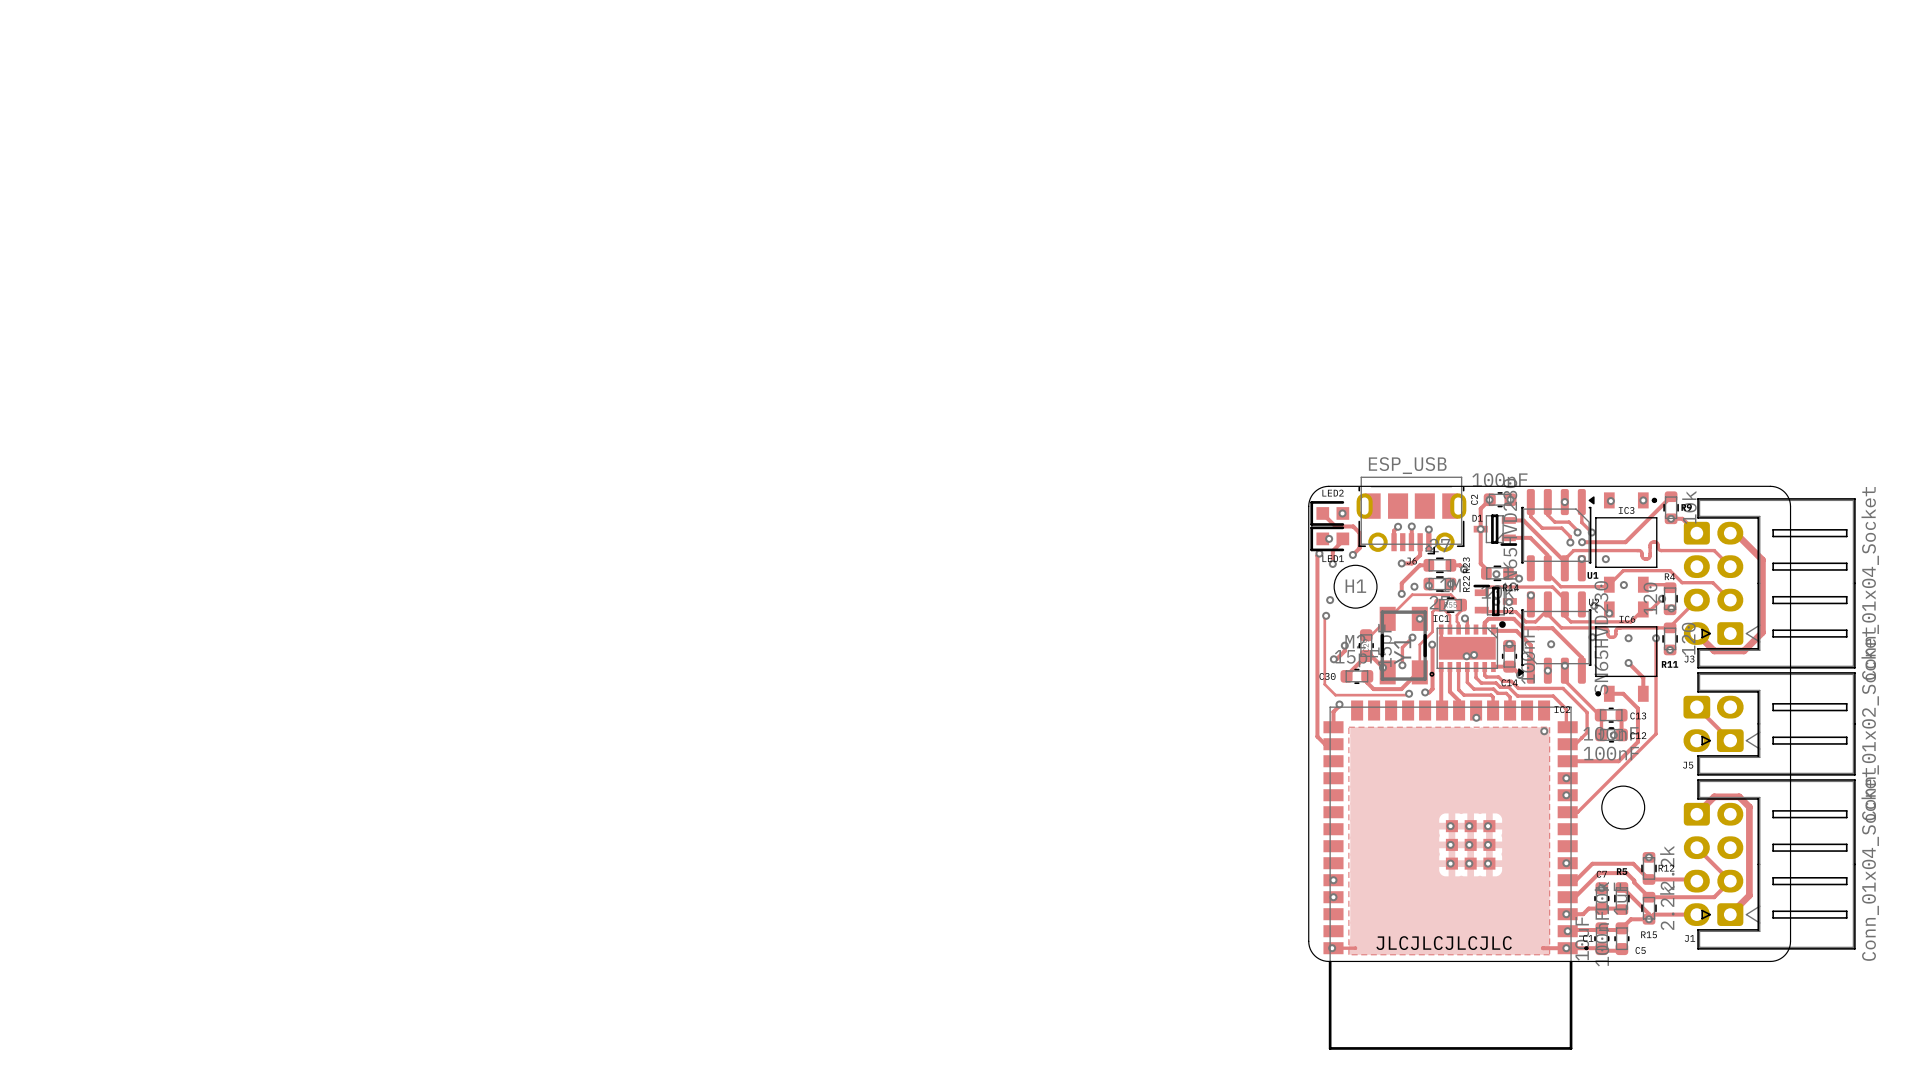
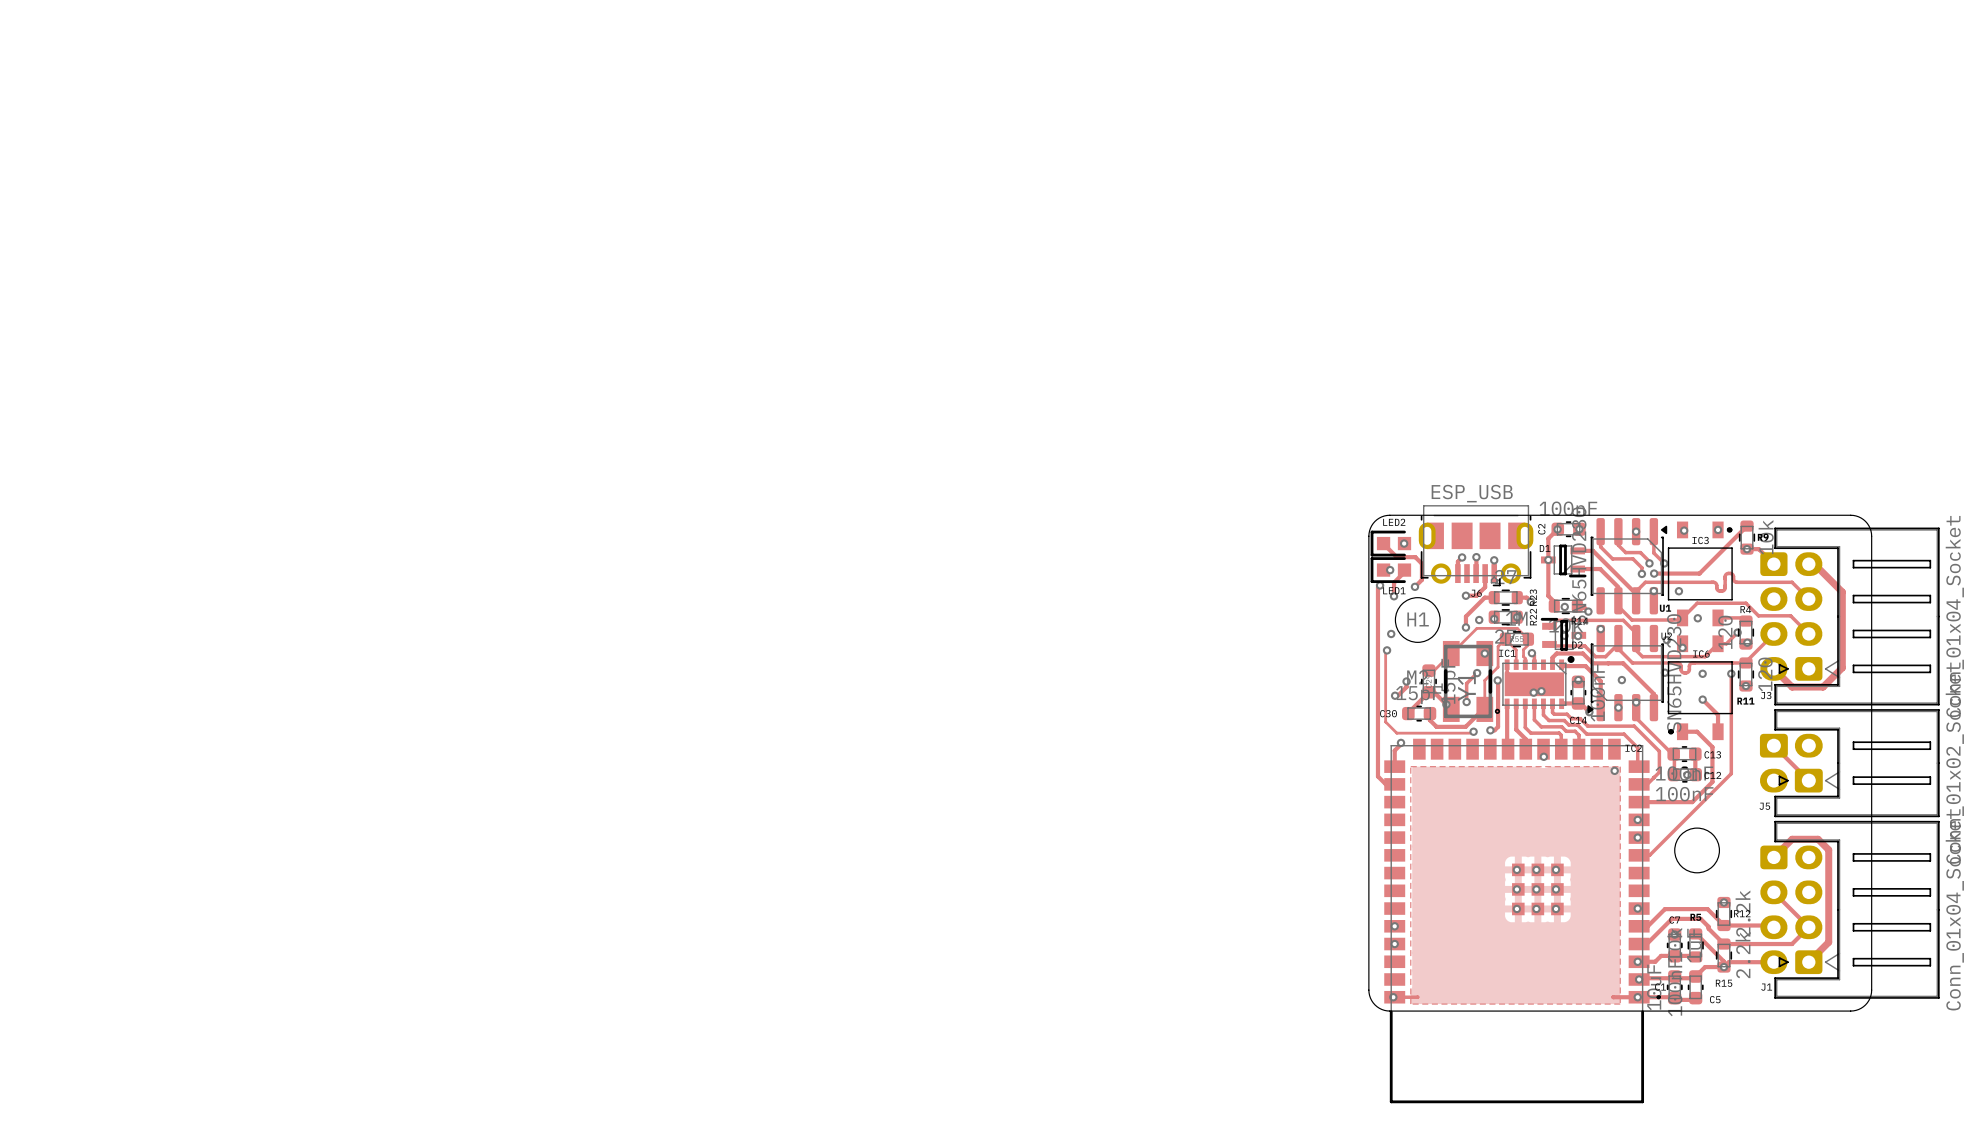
text: JLCJLCJLCJLC (1444, 943) -> none

